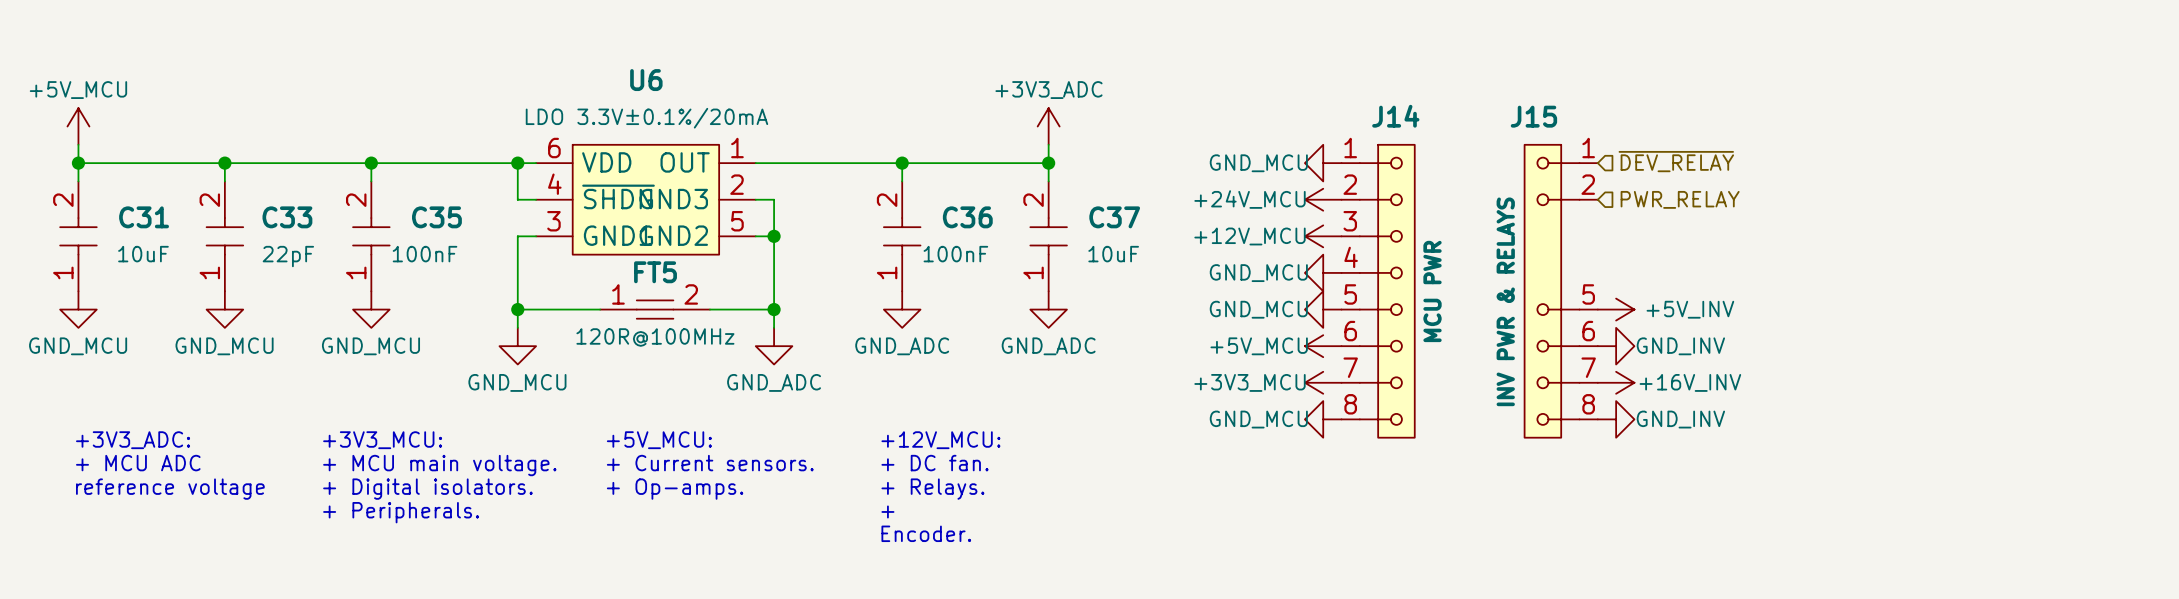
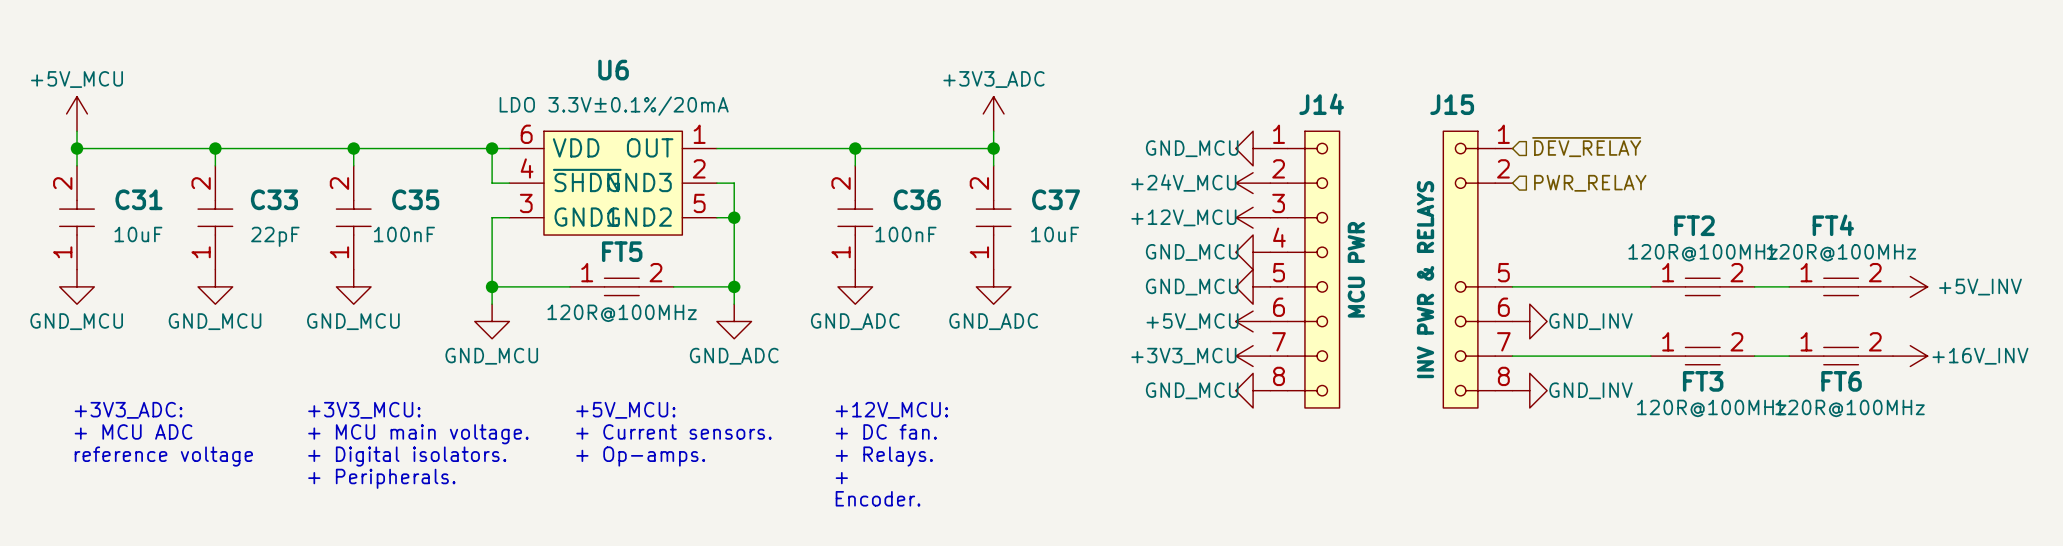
wire: none -> (1512, 286) (1650, 286)
power symbol: +5V_INV (1616, 309) -> none
FT2: none -> 120R@100MHz (1702, 286)
wire: none -> (1754, 286) (1789, 286)
FT4: none -> 120R@100MHz (1841, 286)
power symbol: none -> +5V_INV (1910, 286)
wire: none -> (1512, 356) (1650, 356)
power symbol: +16V_INV (1616, 382) -> none
FT3: none -> 120R@100MHz (1702, 356)
wire: none -> (1754, 356) (1789, 356)
FT6: none -> 120R@100MHz (1841, 356)
power symbol: none -> +16V_INV (1910, 356)

